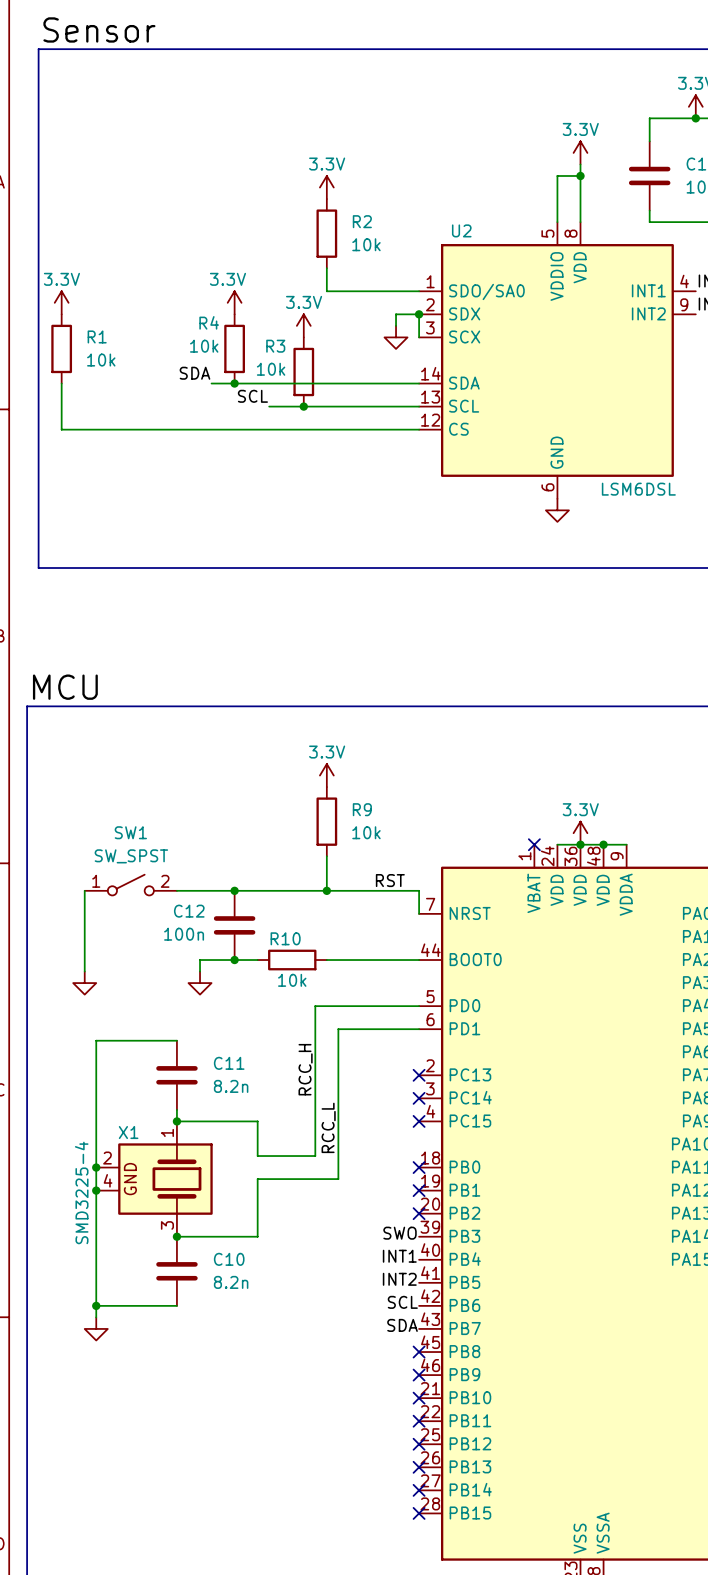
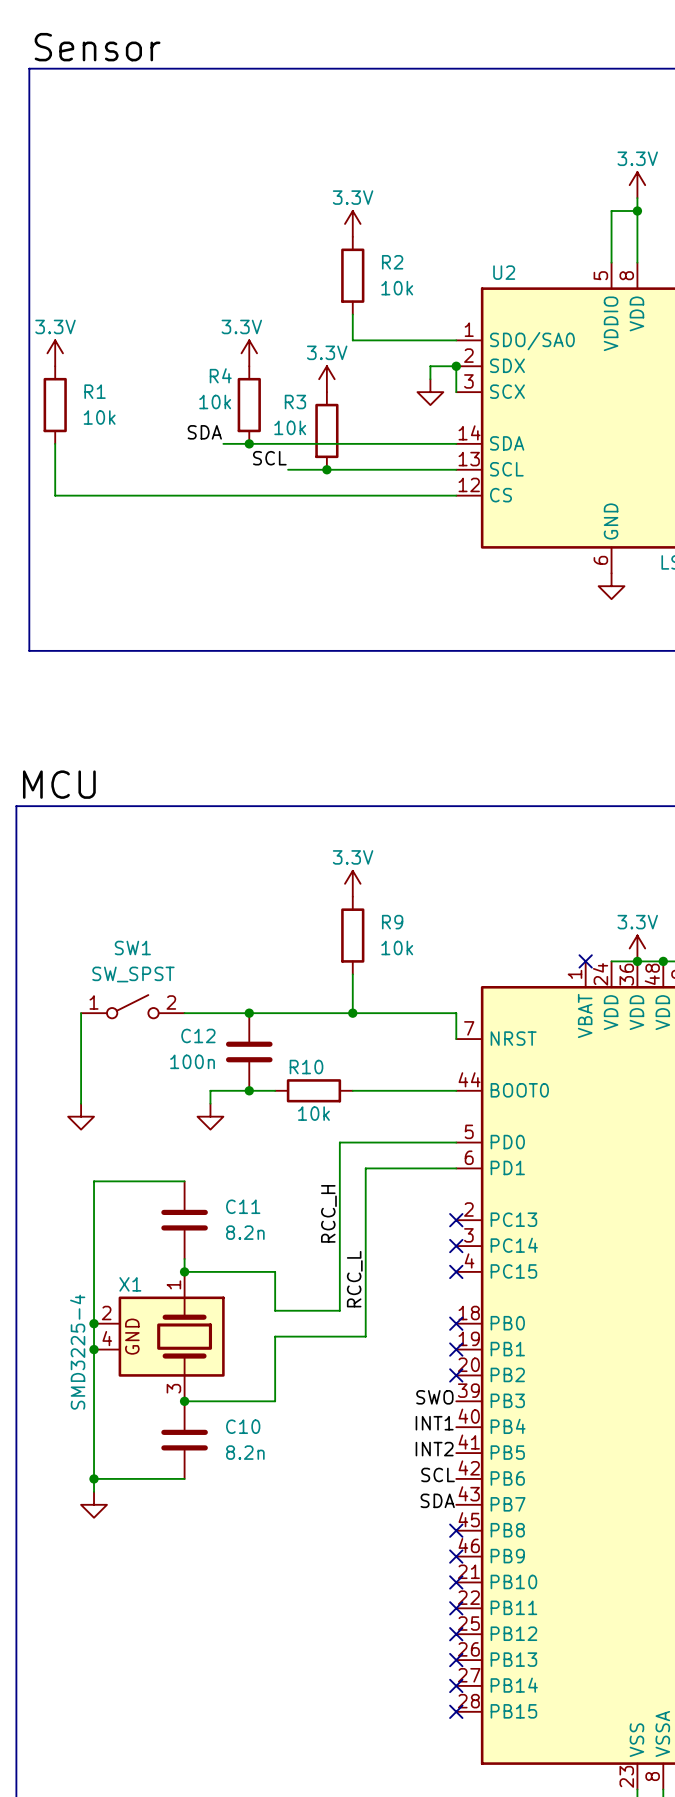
label: RST (390, 880) -> none

